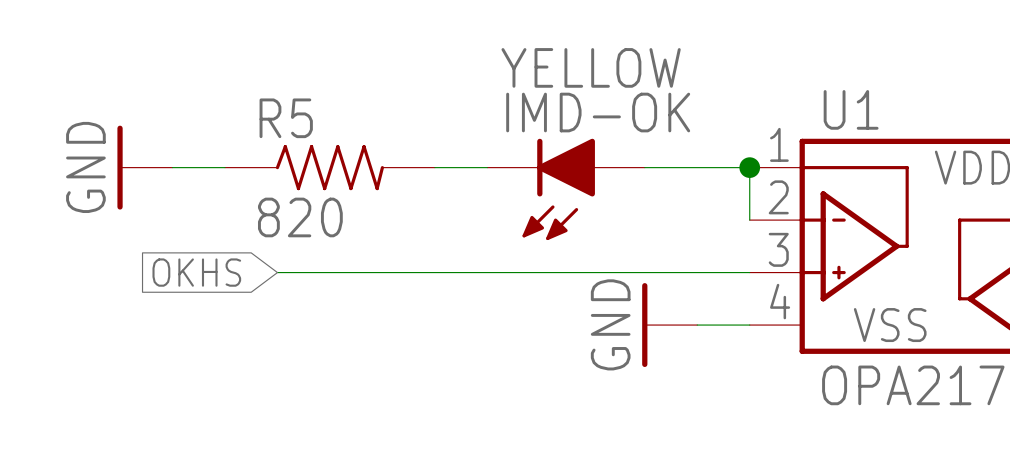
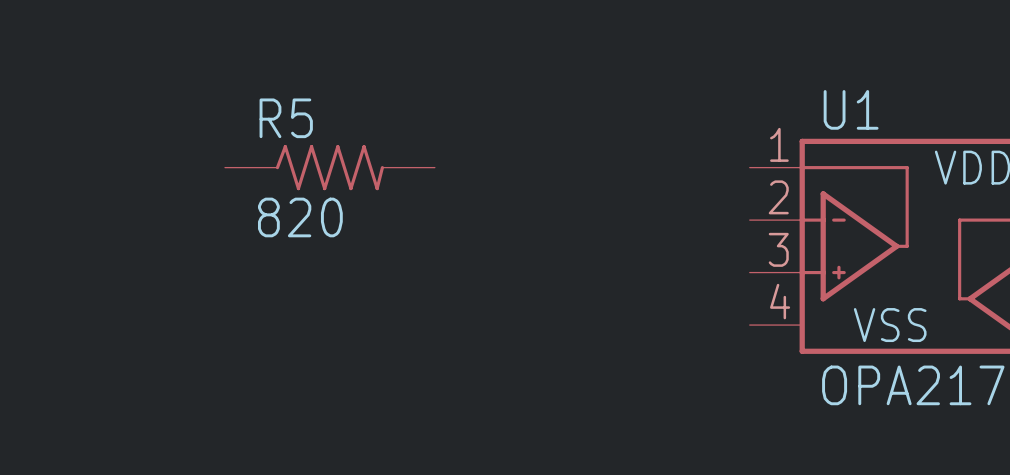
power symbol: GND (144, 167) -> none
wire: (172, 167) (224, 167) -> none
wire: (434, 167) (487, 167) -> none
wire: (644, 167) (749, 167) (749, 220) -> none
junction: (749, 167) -> none
IMD-OK: YELLOW (566, 189) -> none
global label: OKHS (196, 272) -> none
wire: (277, 272) (749, 272) -> none
power symbol: GND (669, 325) -> none
wire: (697, 325) (749, 325) -> none

